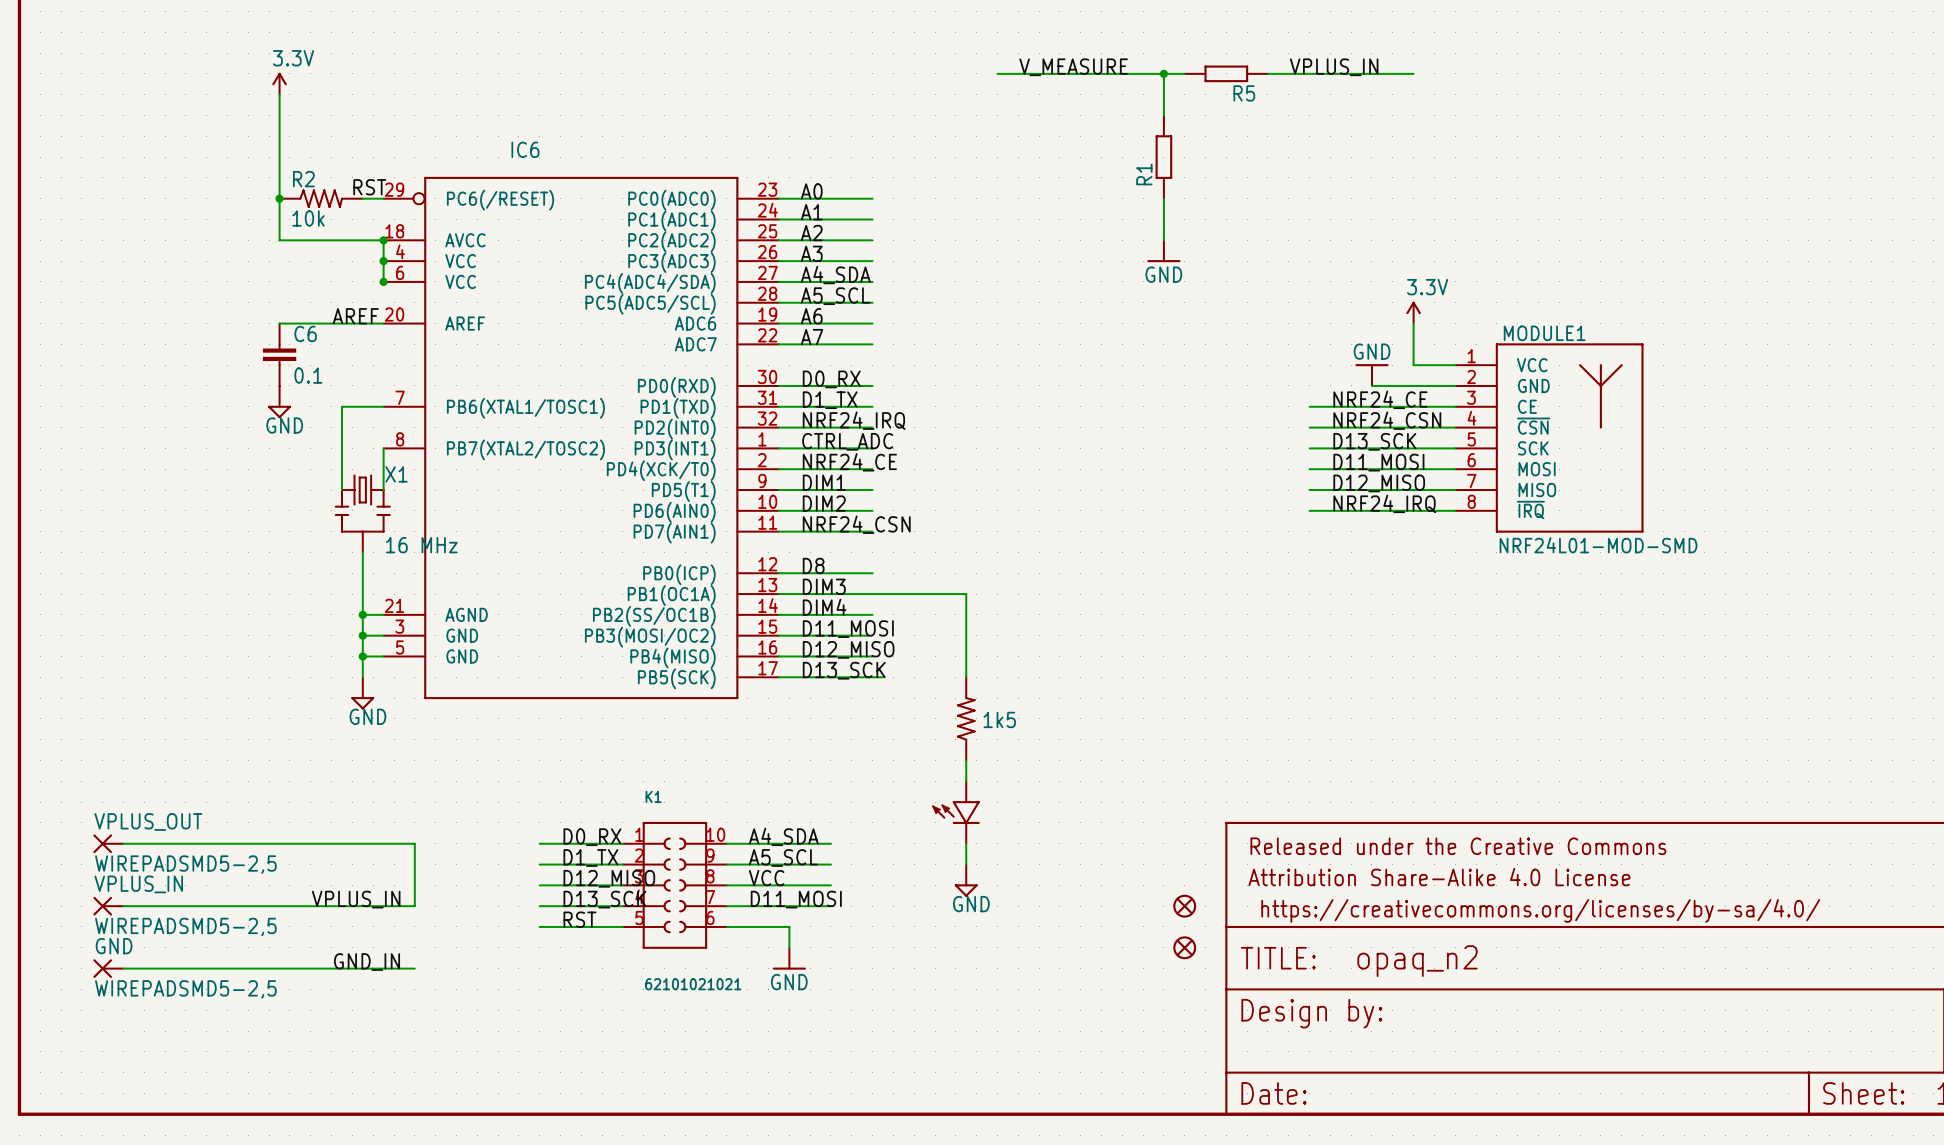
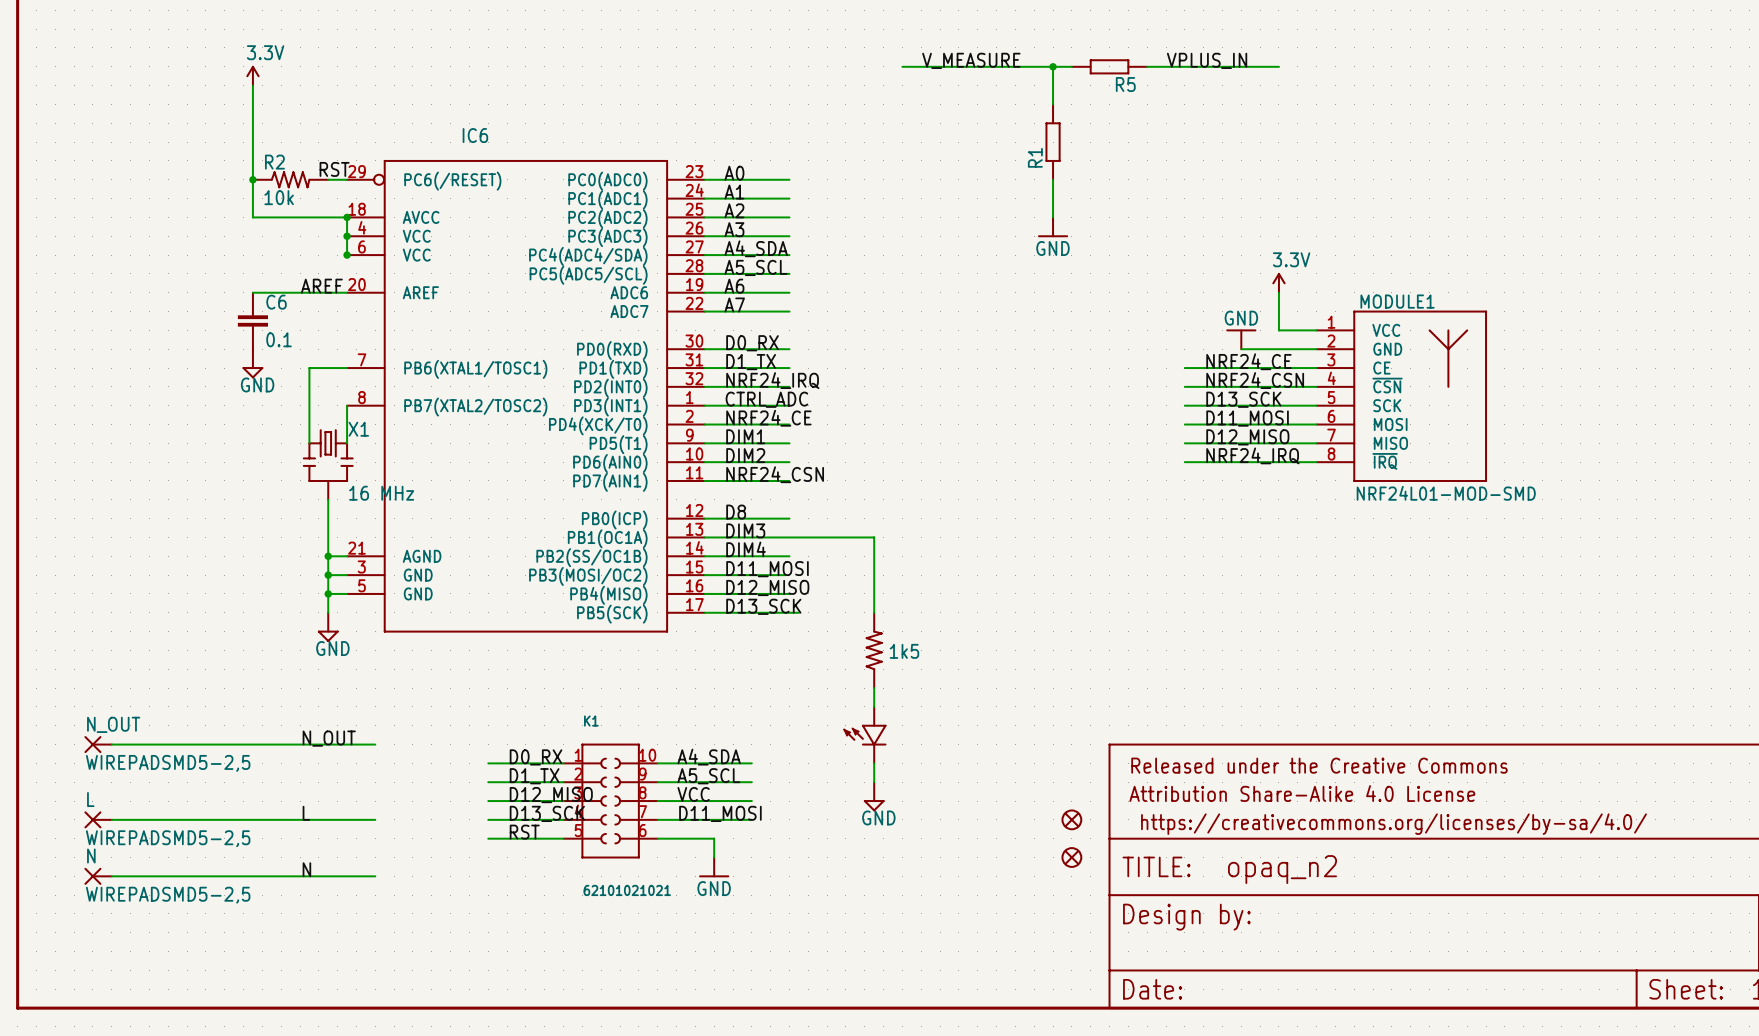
label: none -> N_OUT (329, 738)
N_OUT: none -> WIREPADSMD5-2,5 (98, 744)
wire: none -> (111, 744) (375, 744)
VPLUS_OUT: WIREPADSMD5-2,5 (108, 843) -> none
wire: (123, 843) (414, 843) (414, 906) -> none
VPLUS_IN name: VPLUS_IN (138, 884) -> L (90, 799)
label: none -> L (306, 813)
label: VPLUS_IN (356, 899) -> none
GND name: GND (114, 946) -> N (91, 856)
label: GND_IN (367, 962) -> N (306, 869)

